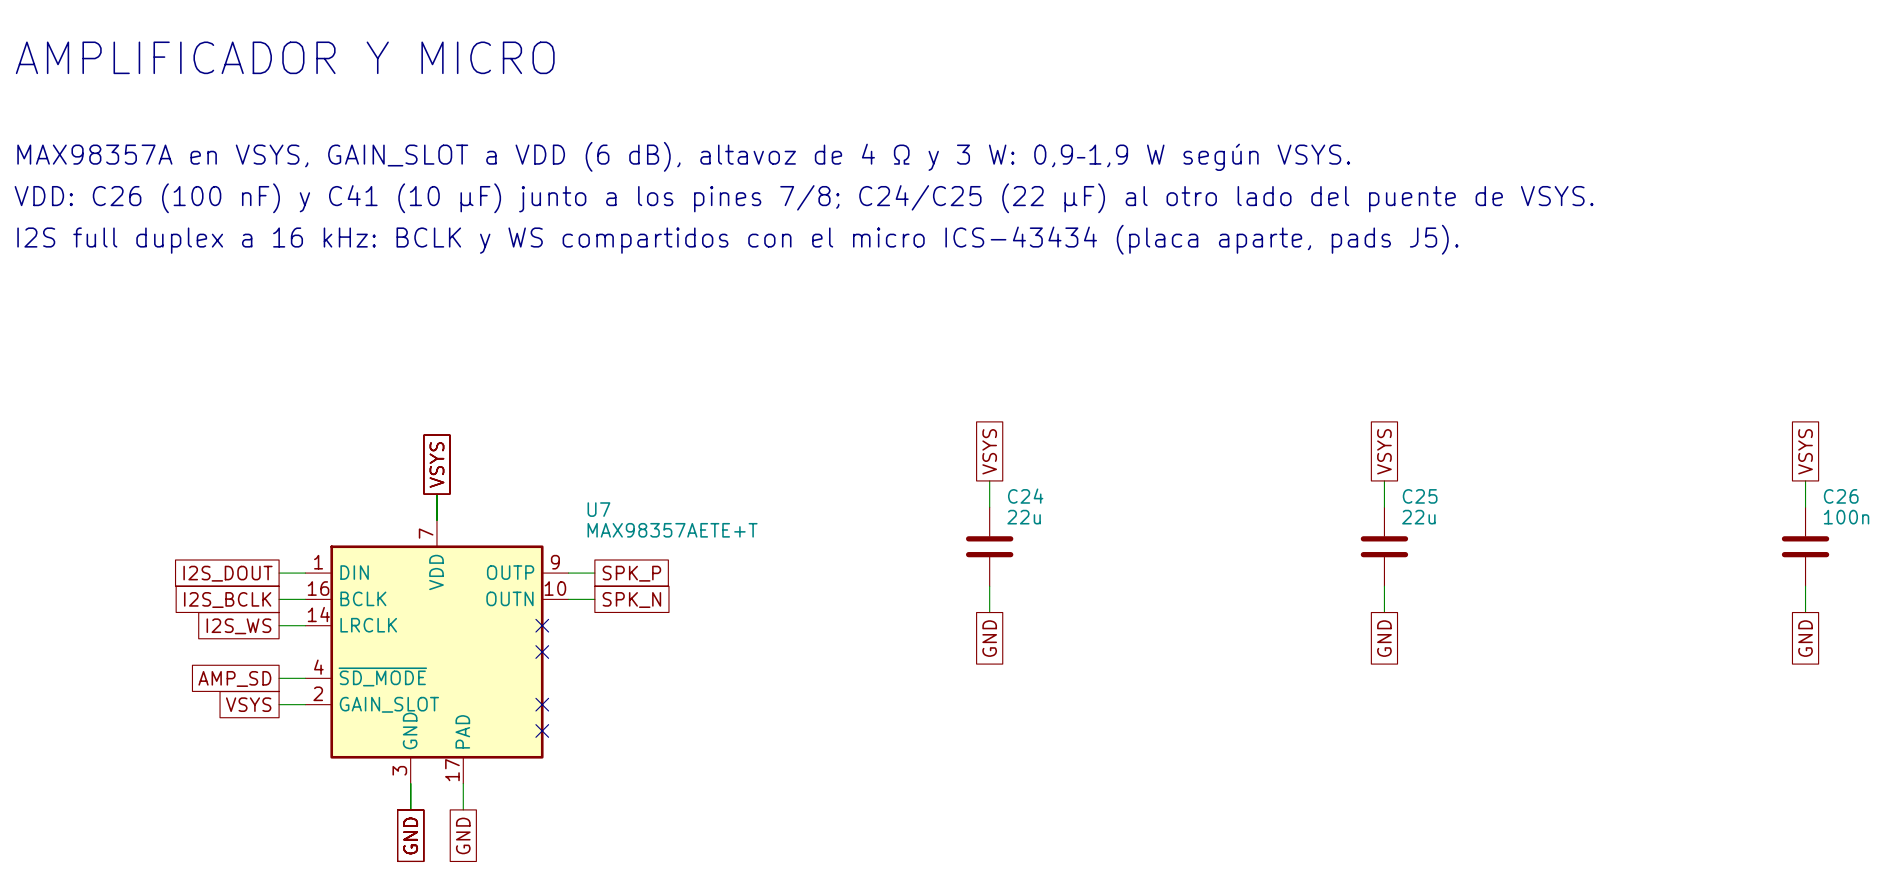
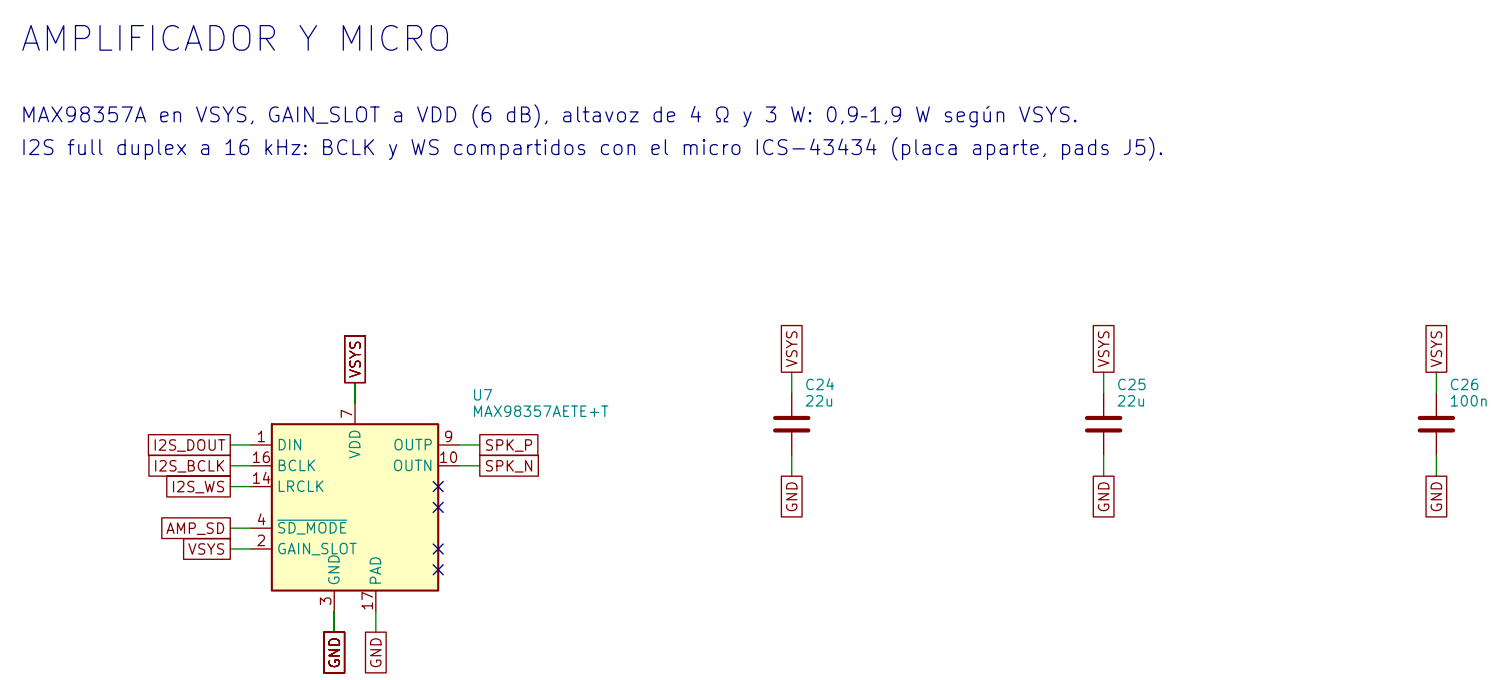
text: VDD: C26 (100 nF) y C41 (10 µF) junto a los pines 7/8; C24/C25 (22 µF) al otro lado del puente de VSYS. (804, 198) -> I2S full duplex a 16 kHz: BCLK y WS compartidos con el micro ICS-43434 (placa aparte, pads J5). (592, 148)
text: I2S full duplex a 16 kHz: BCLK y WS compartidos con el micro ICS-43434 (placa aparte, pads J5). (737, 239) -> none

